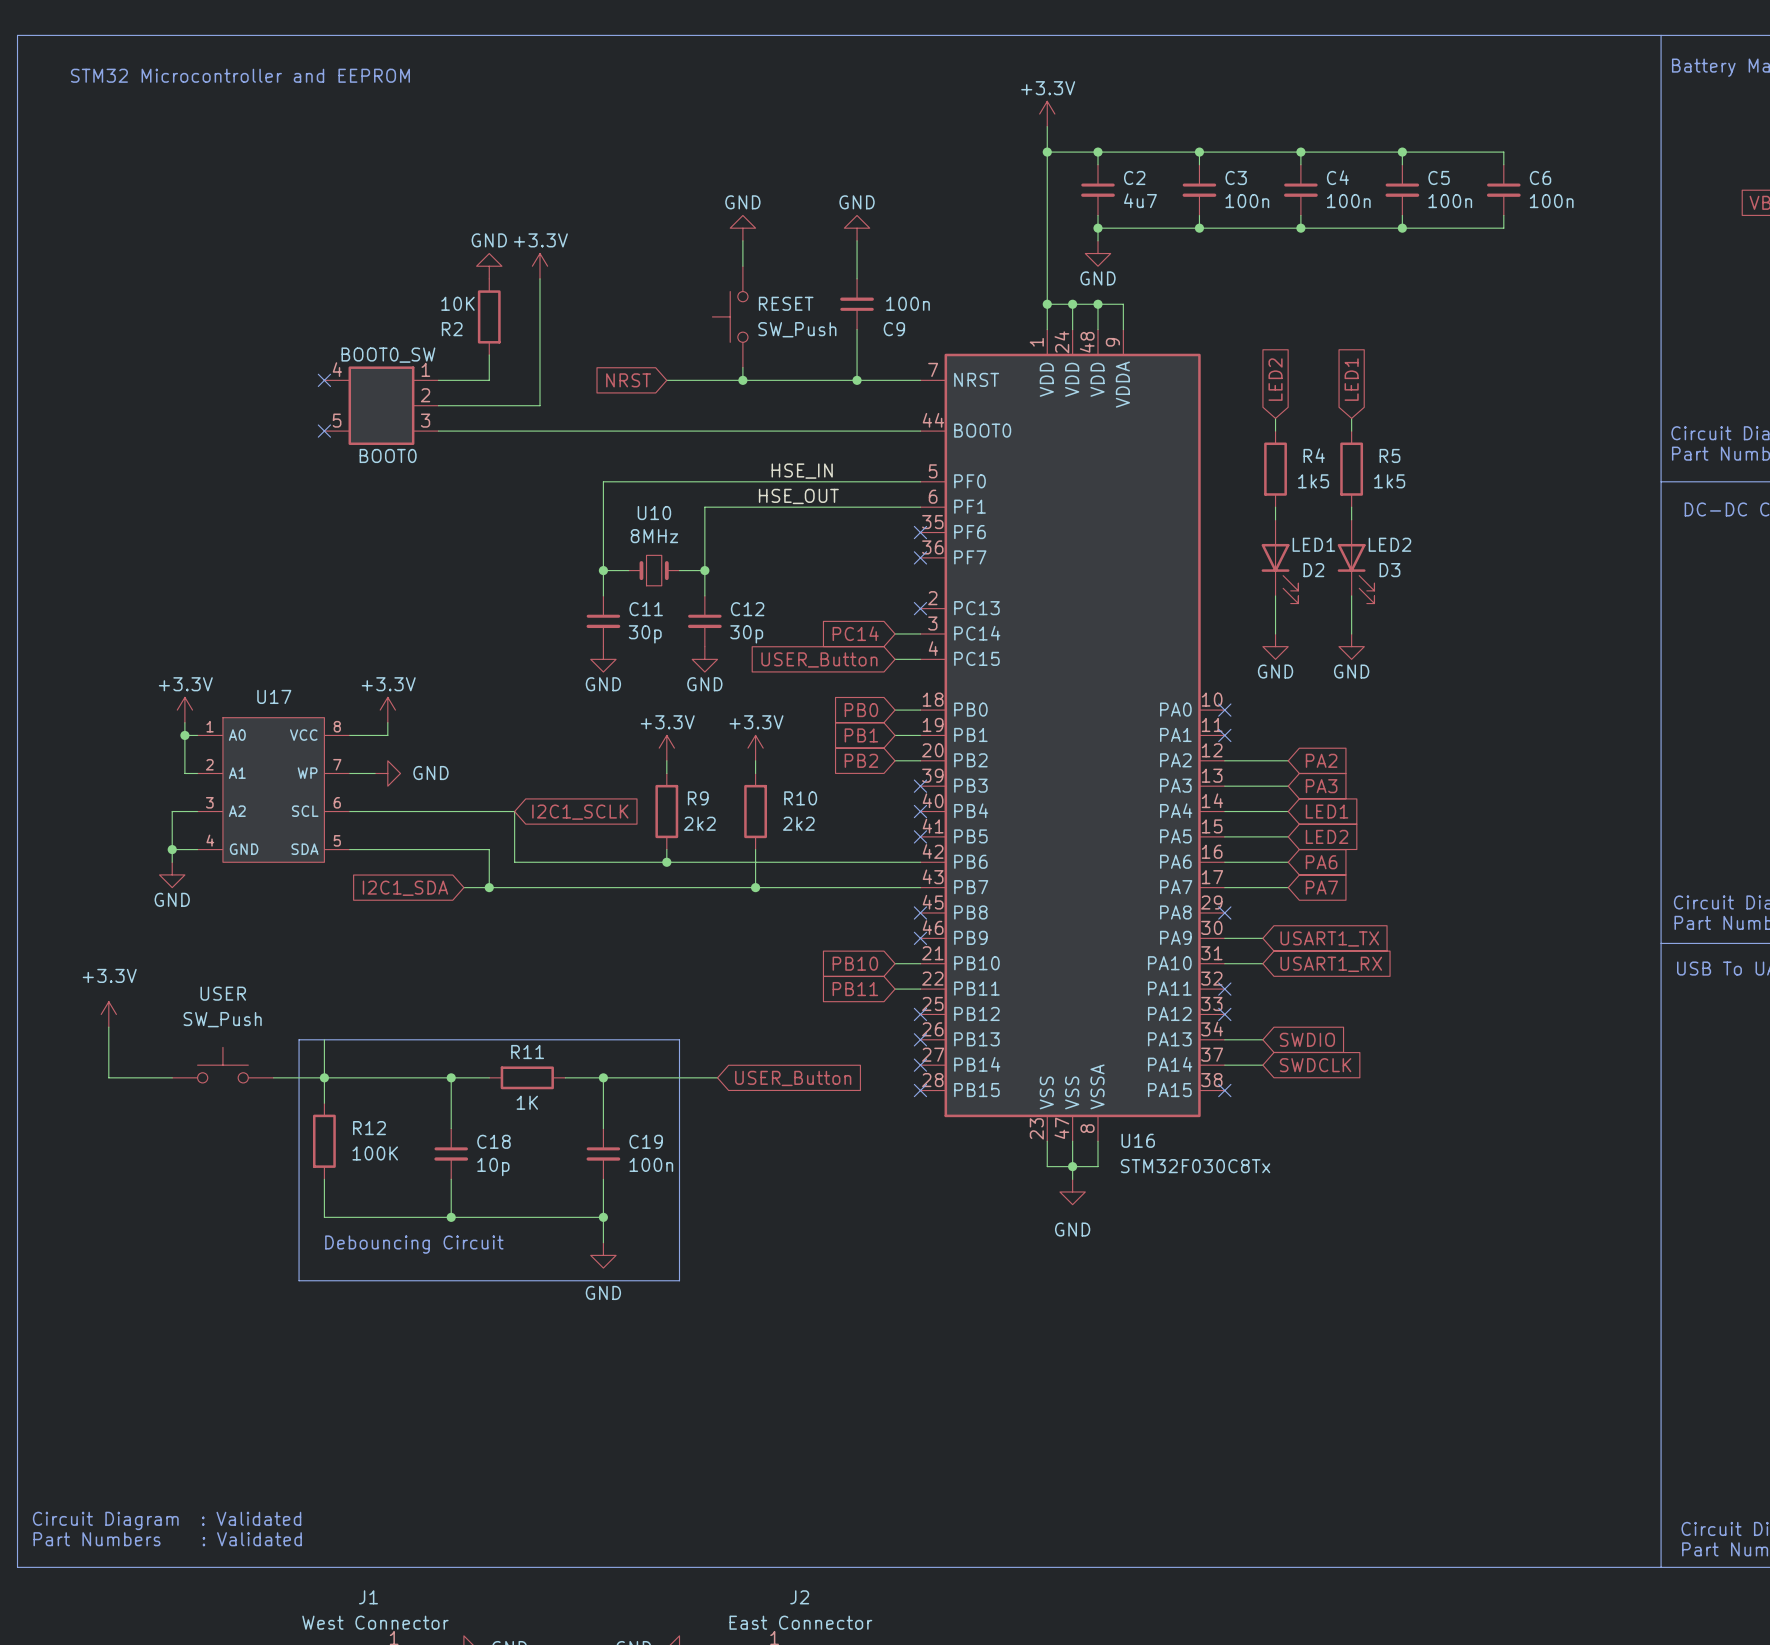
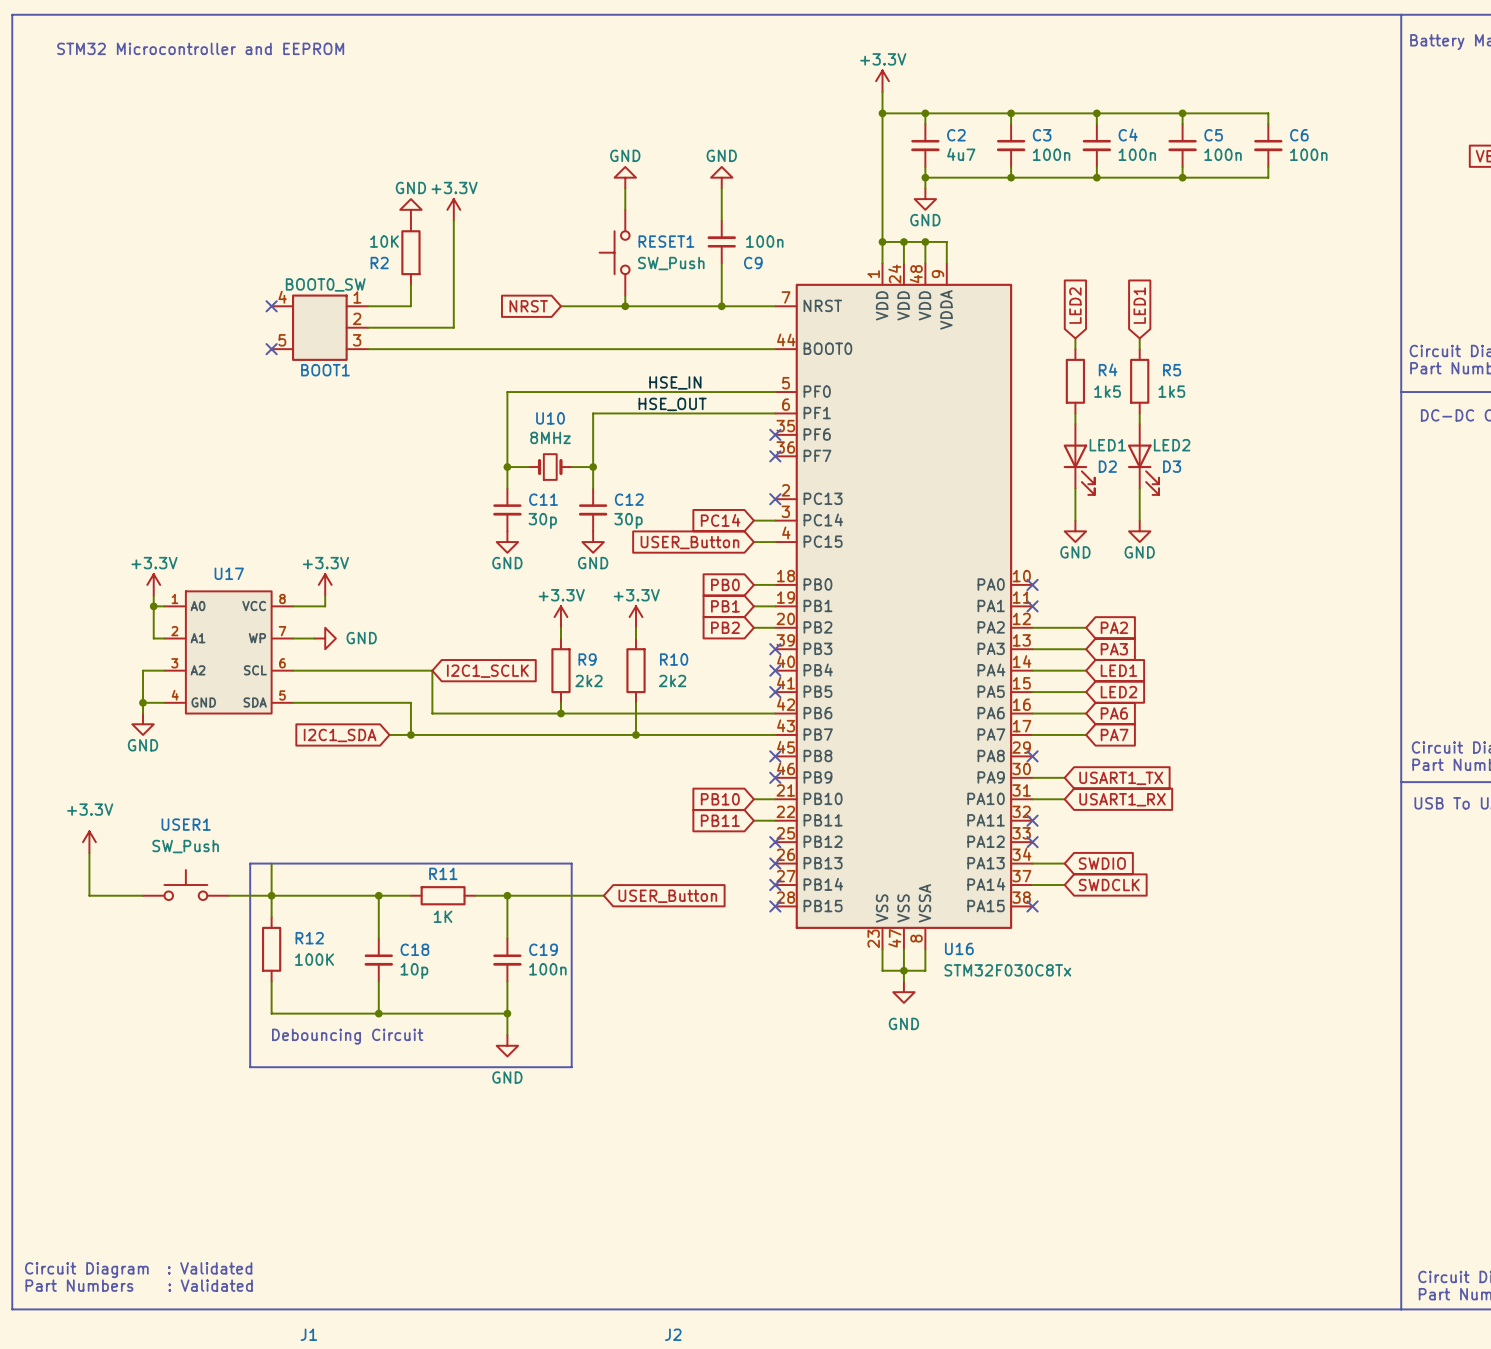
RESET name: RESET (786, 303) -> RESET1 (666, 241)
BOOT0 name: BOOT0 (388, 455) -> BOOT1 (325, 370)
USER name: USER (223, 993) -> USER1 (186, 824)

